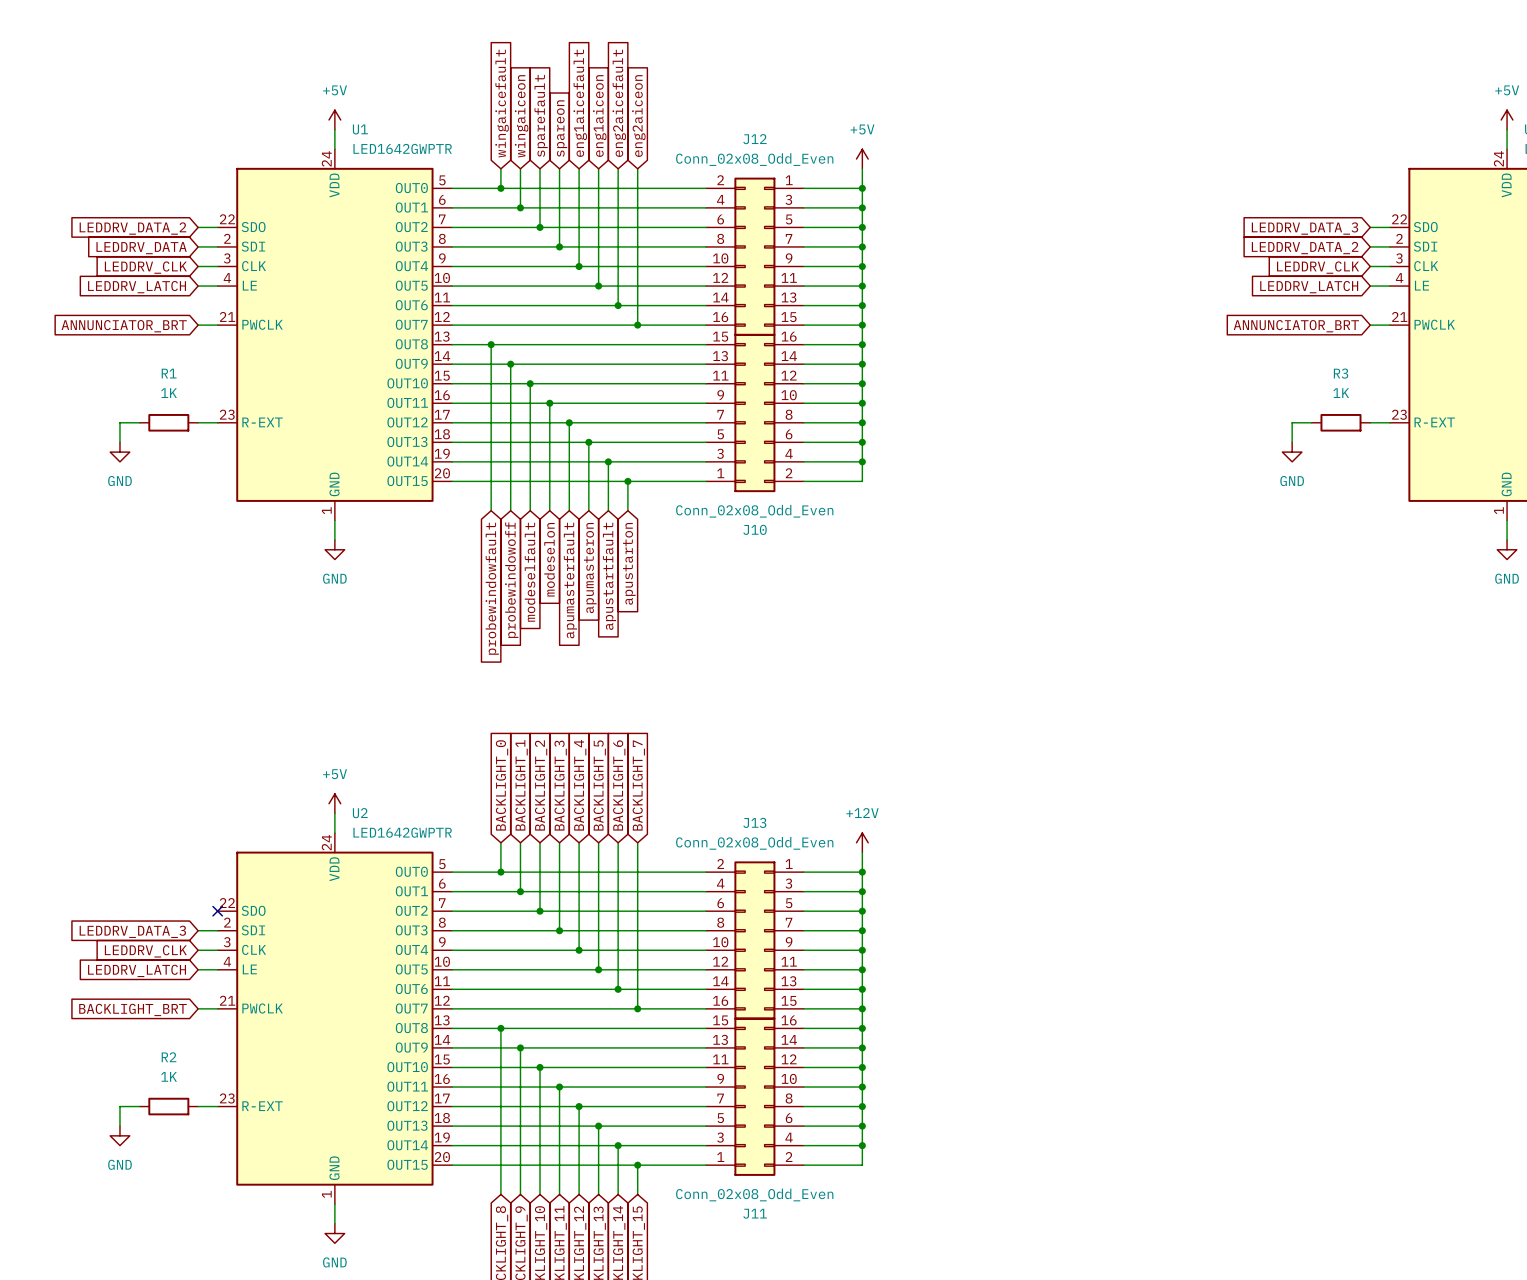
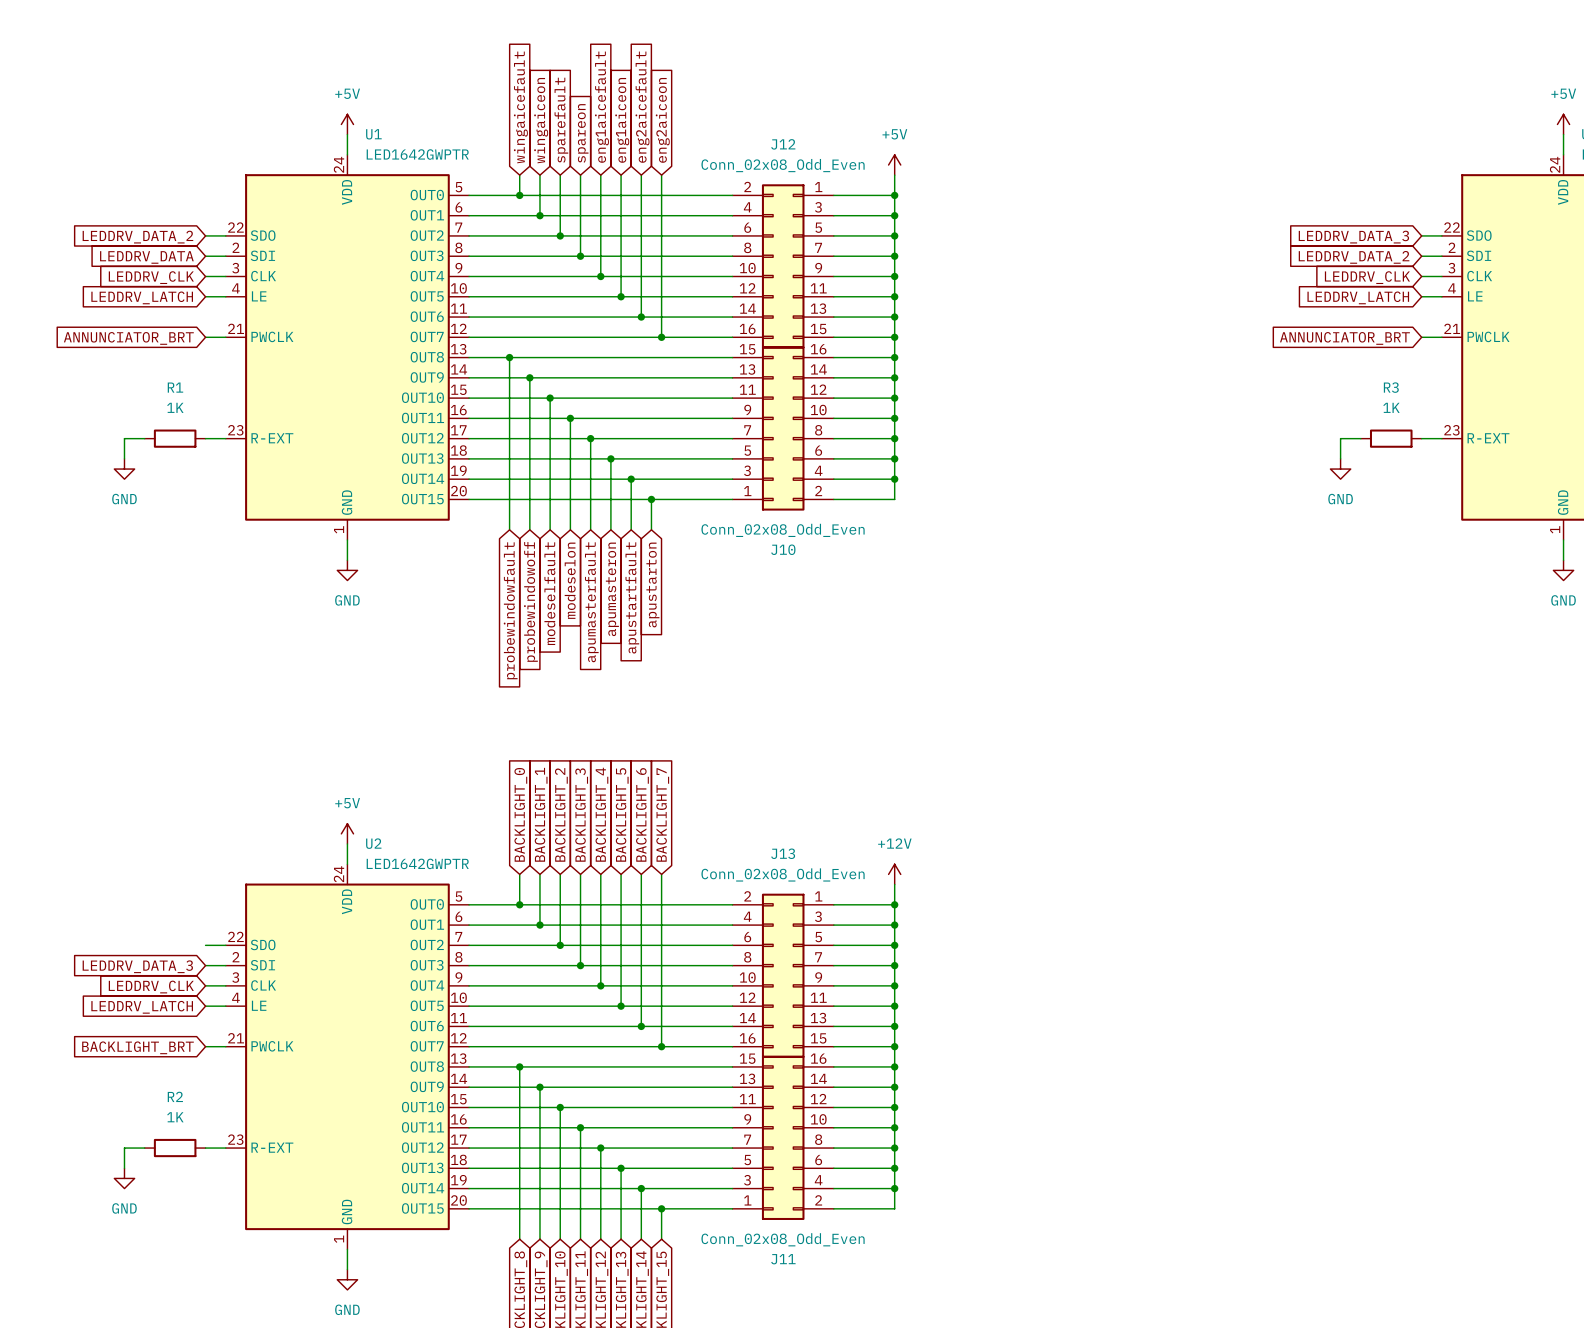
wire: none -> (205, 945) (225, 945)
no-connect mark: (217, 911) -> none

